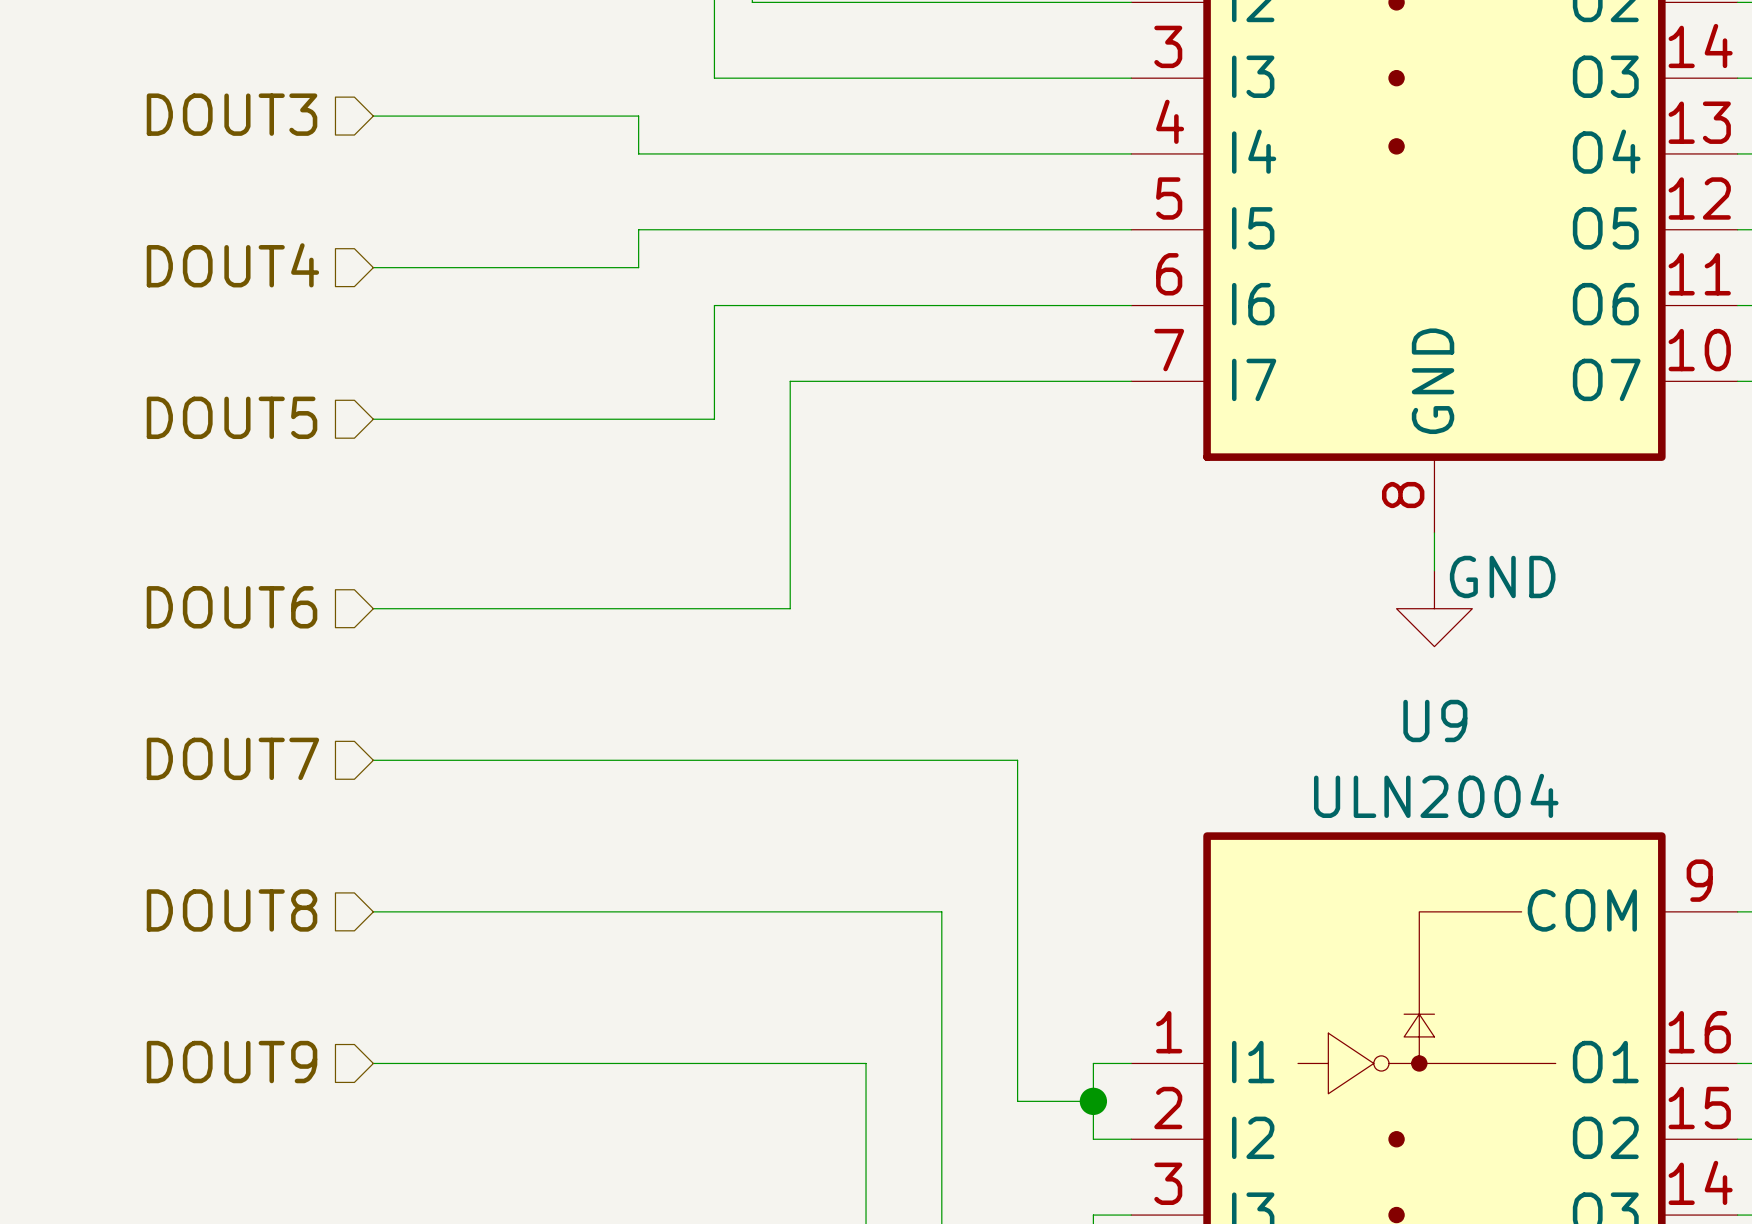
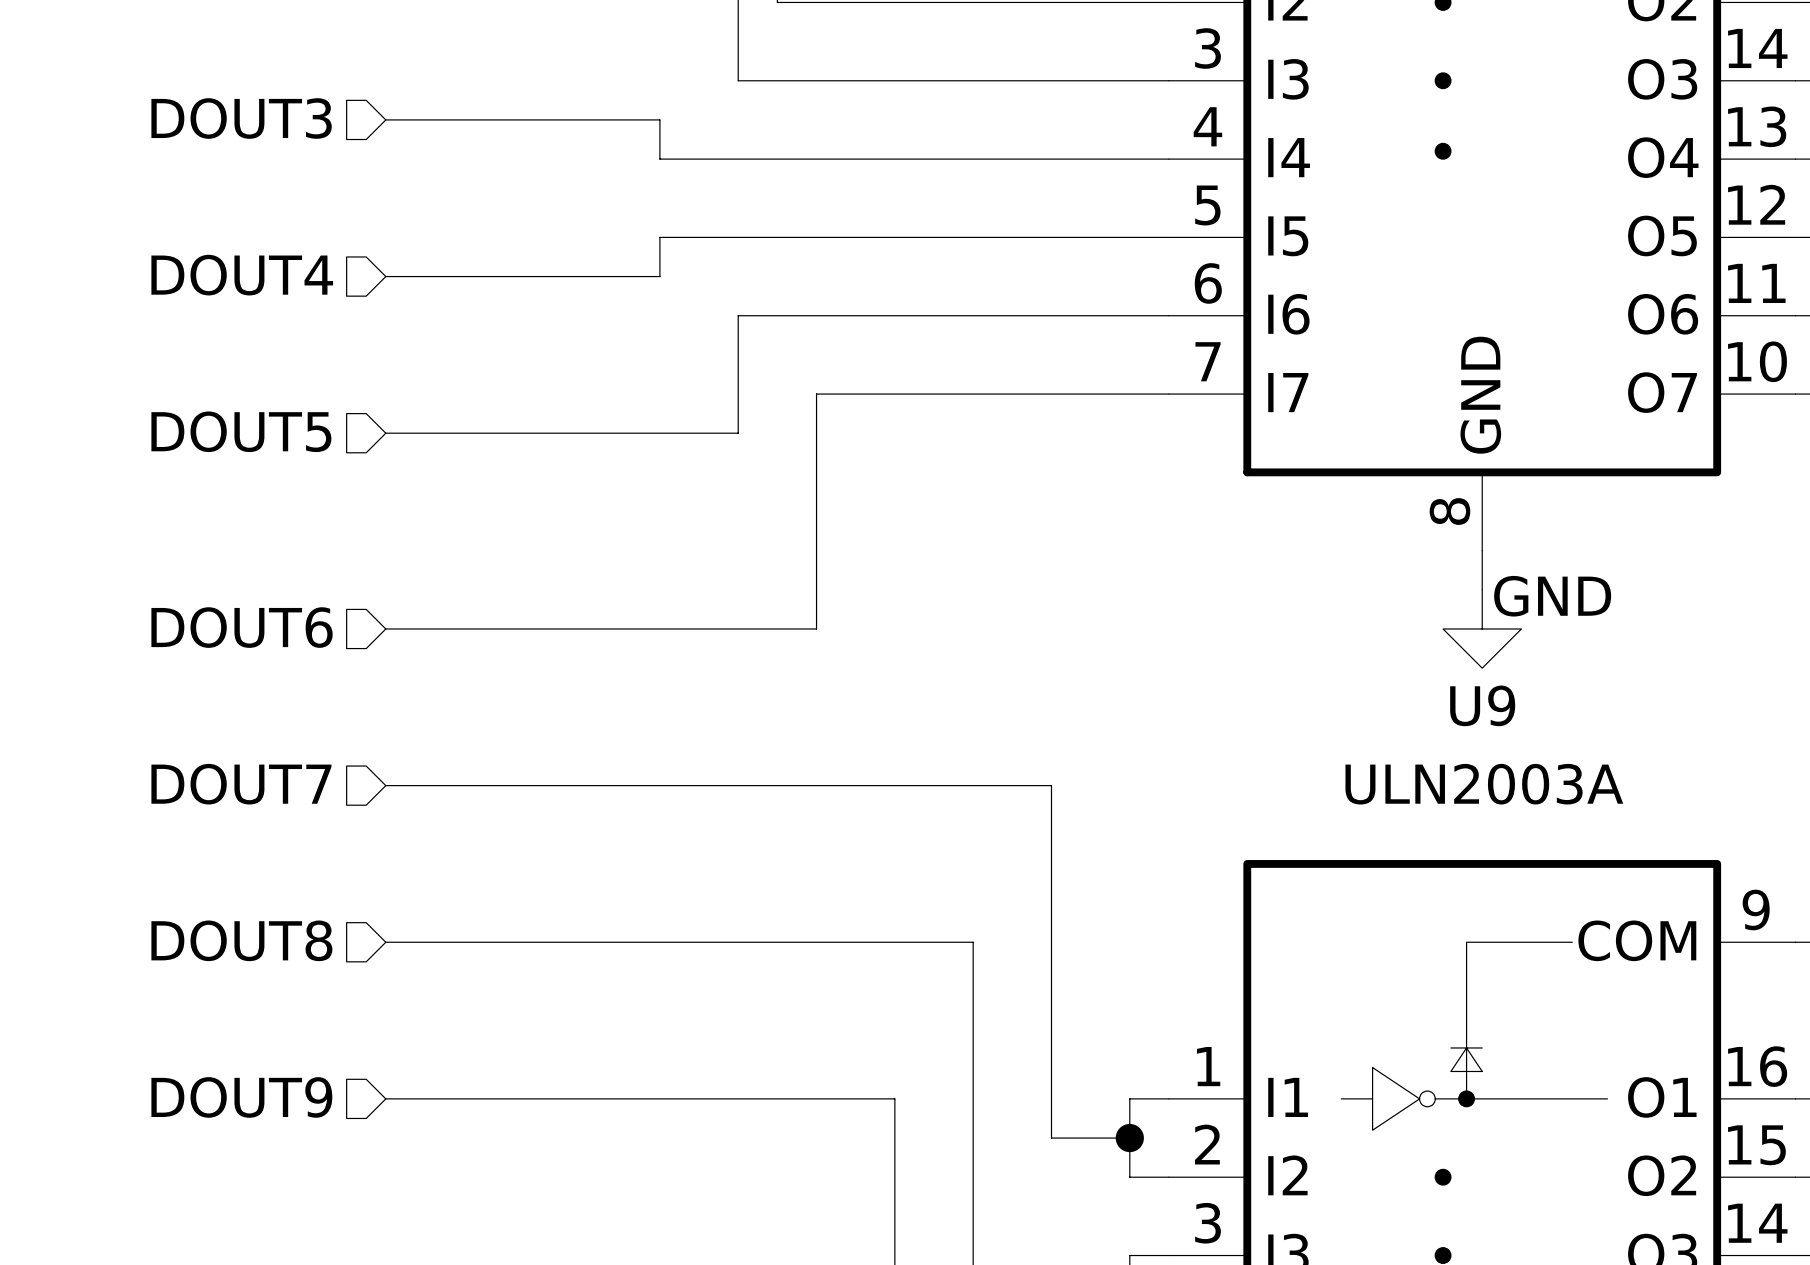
U9 name position: U9 (1435, 720) -> U9 (1482, 705)
U9 value: ULN2004 (1436, 795) -> ULN2003A (1484, 784)

